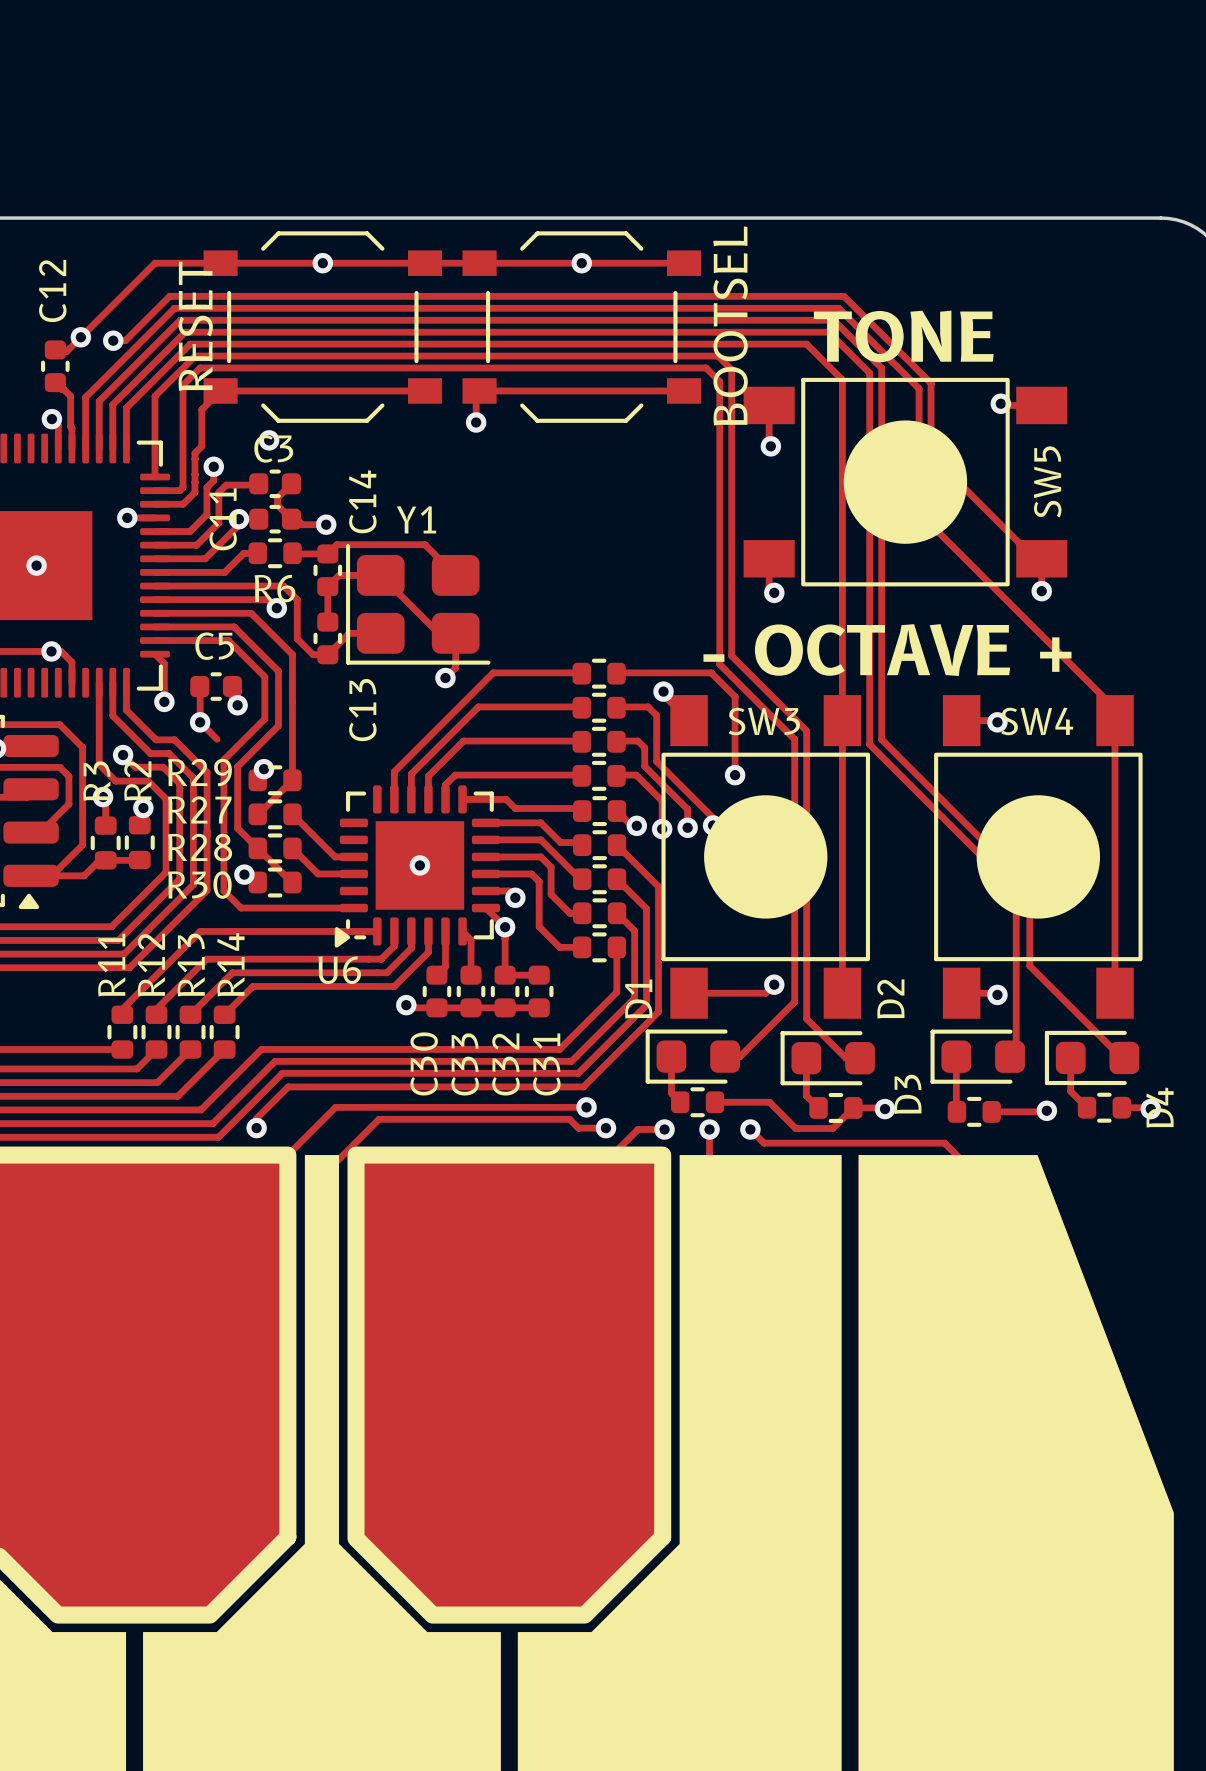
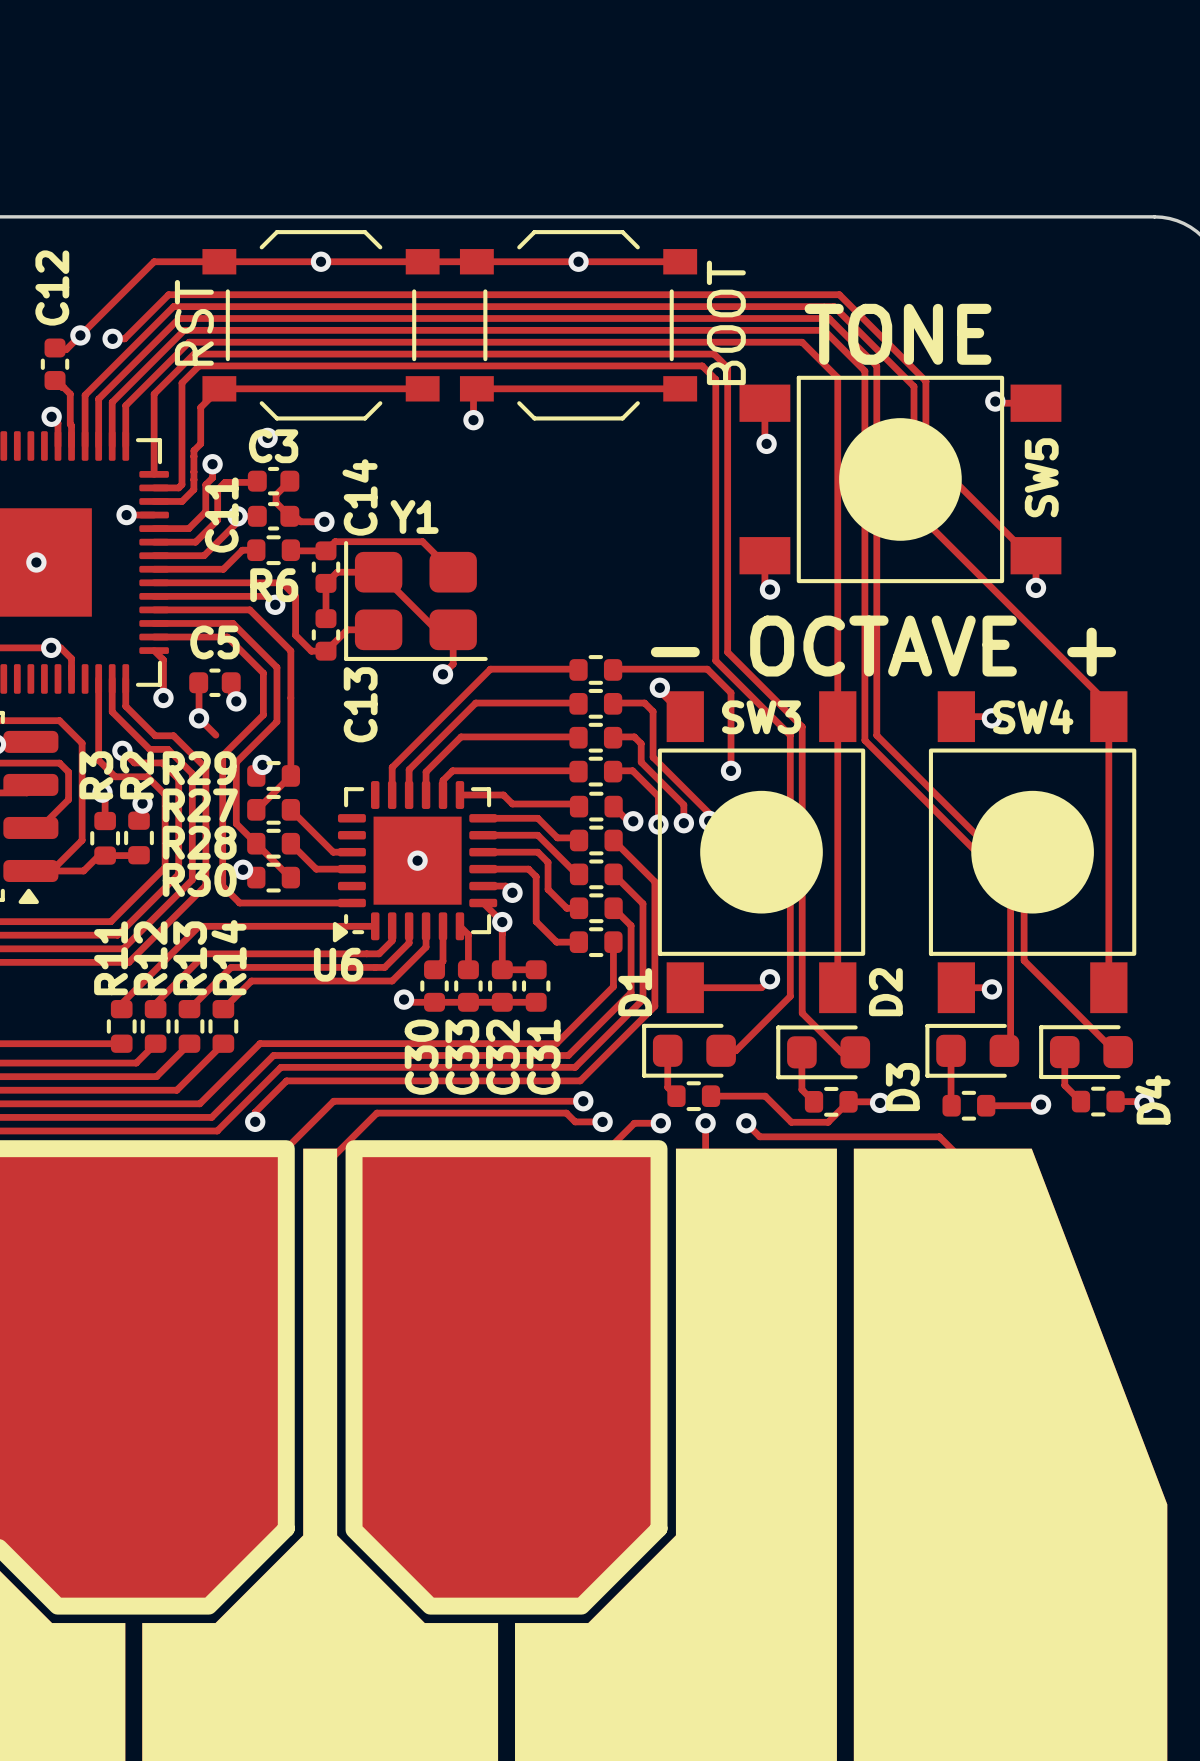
part value: BOOTSEL (730, 325) -> BOOT (726, 322)
part value: RESET (195, 326) -> RST (194, 322)

